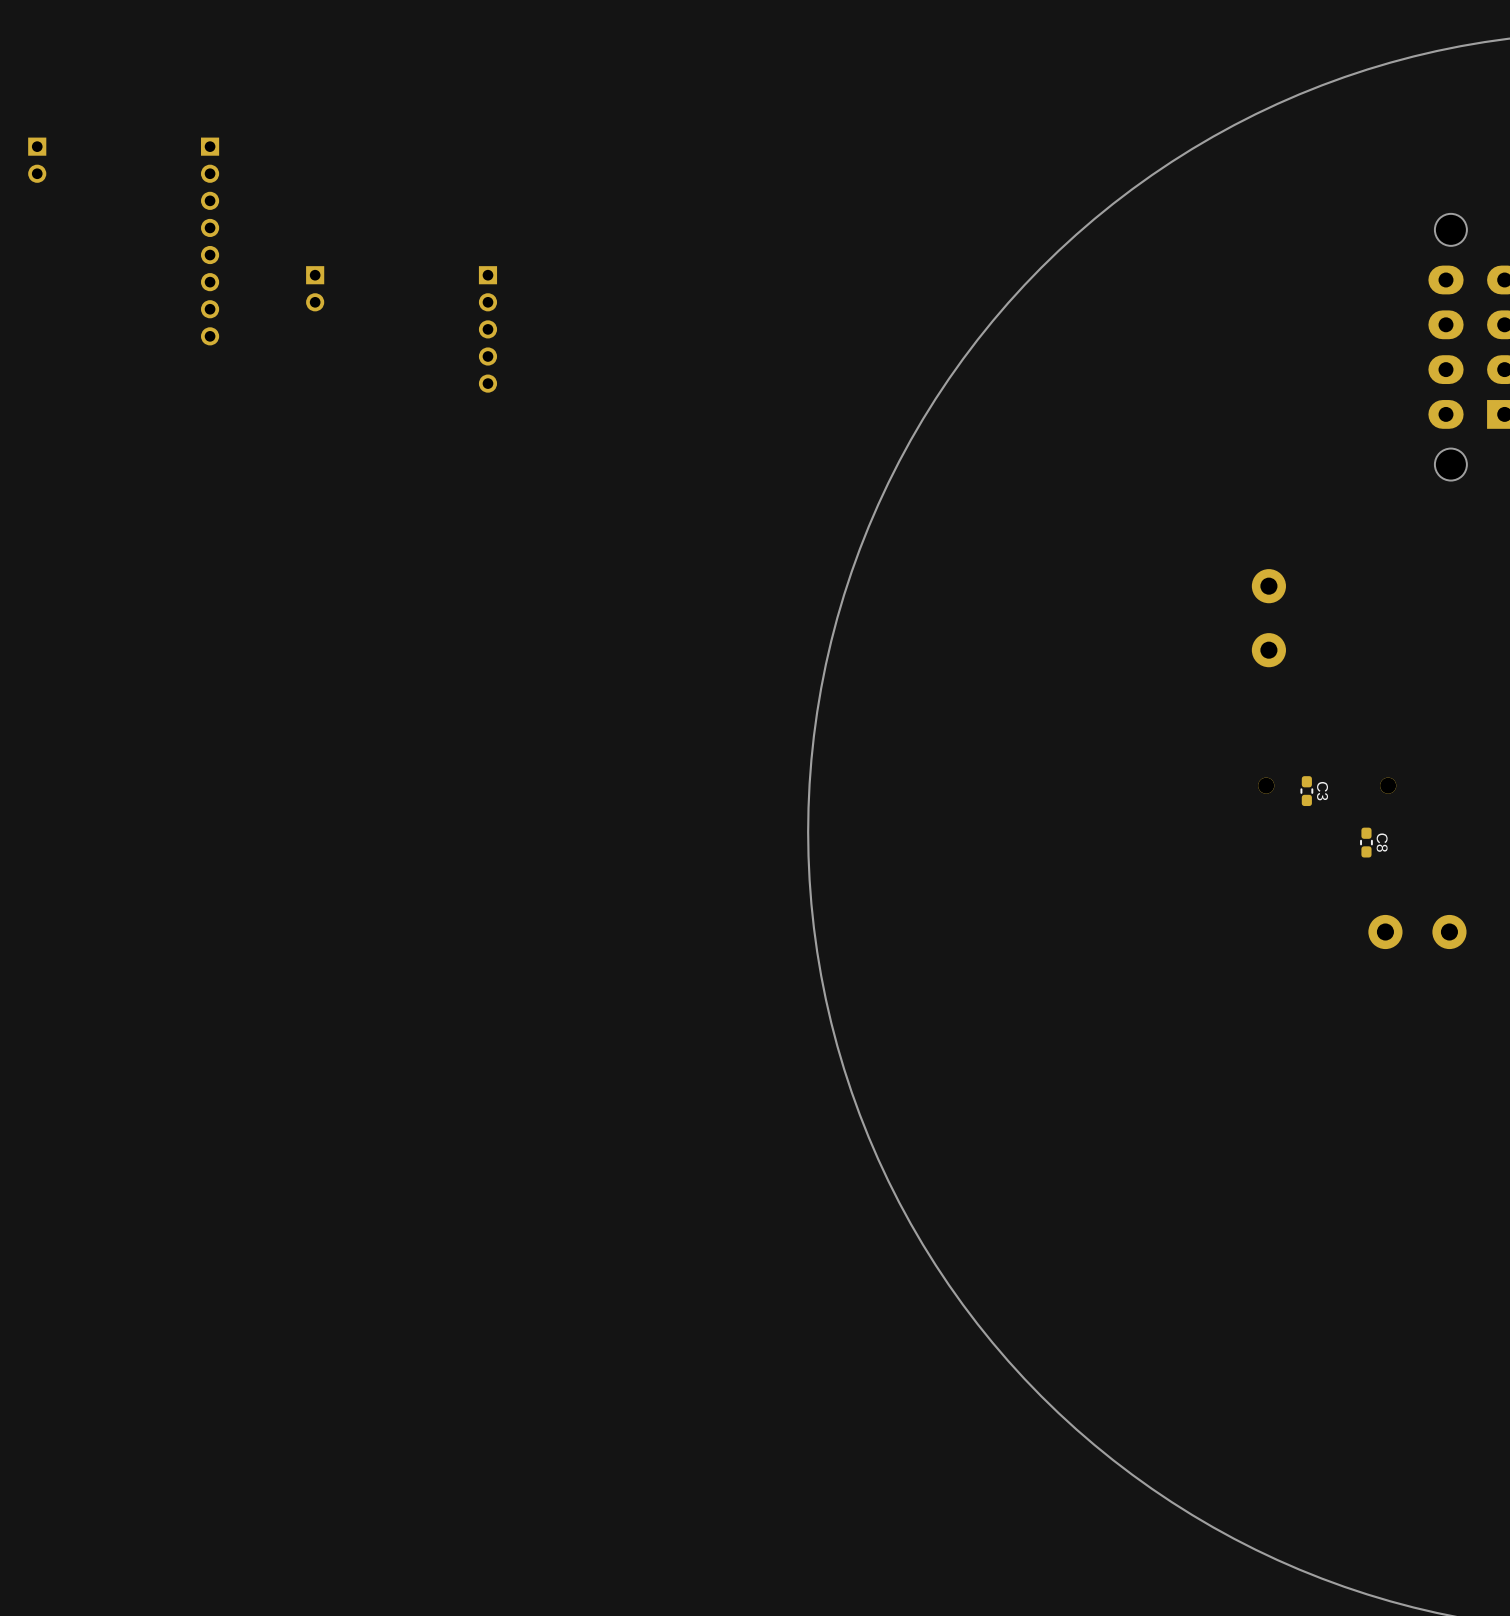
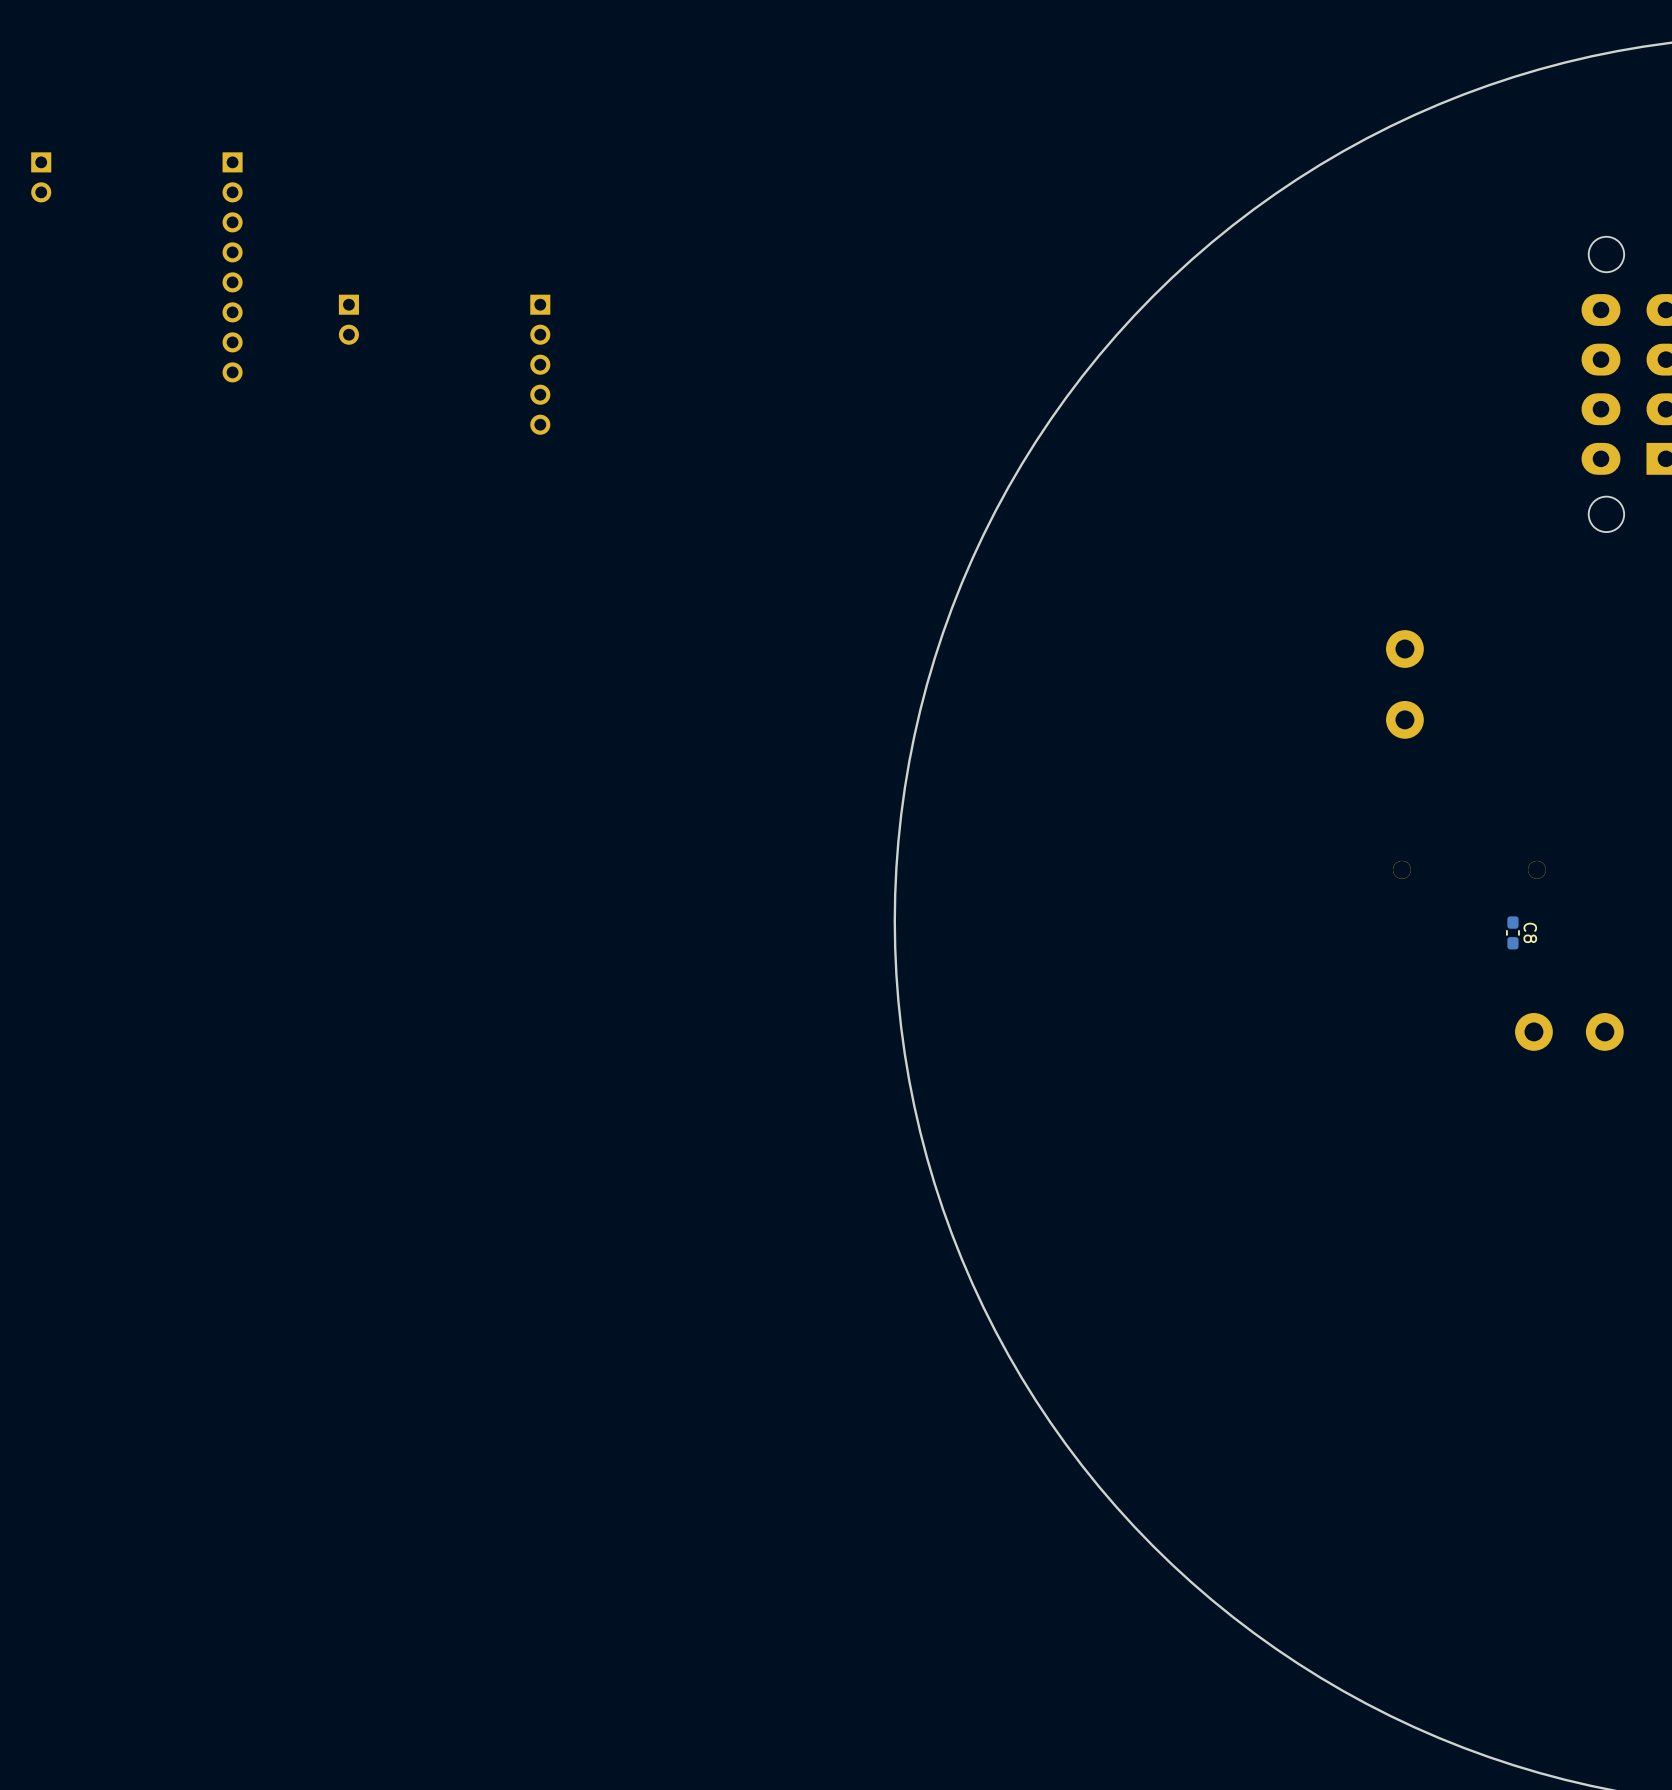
C3: (1306, 791) -> none

